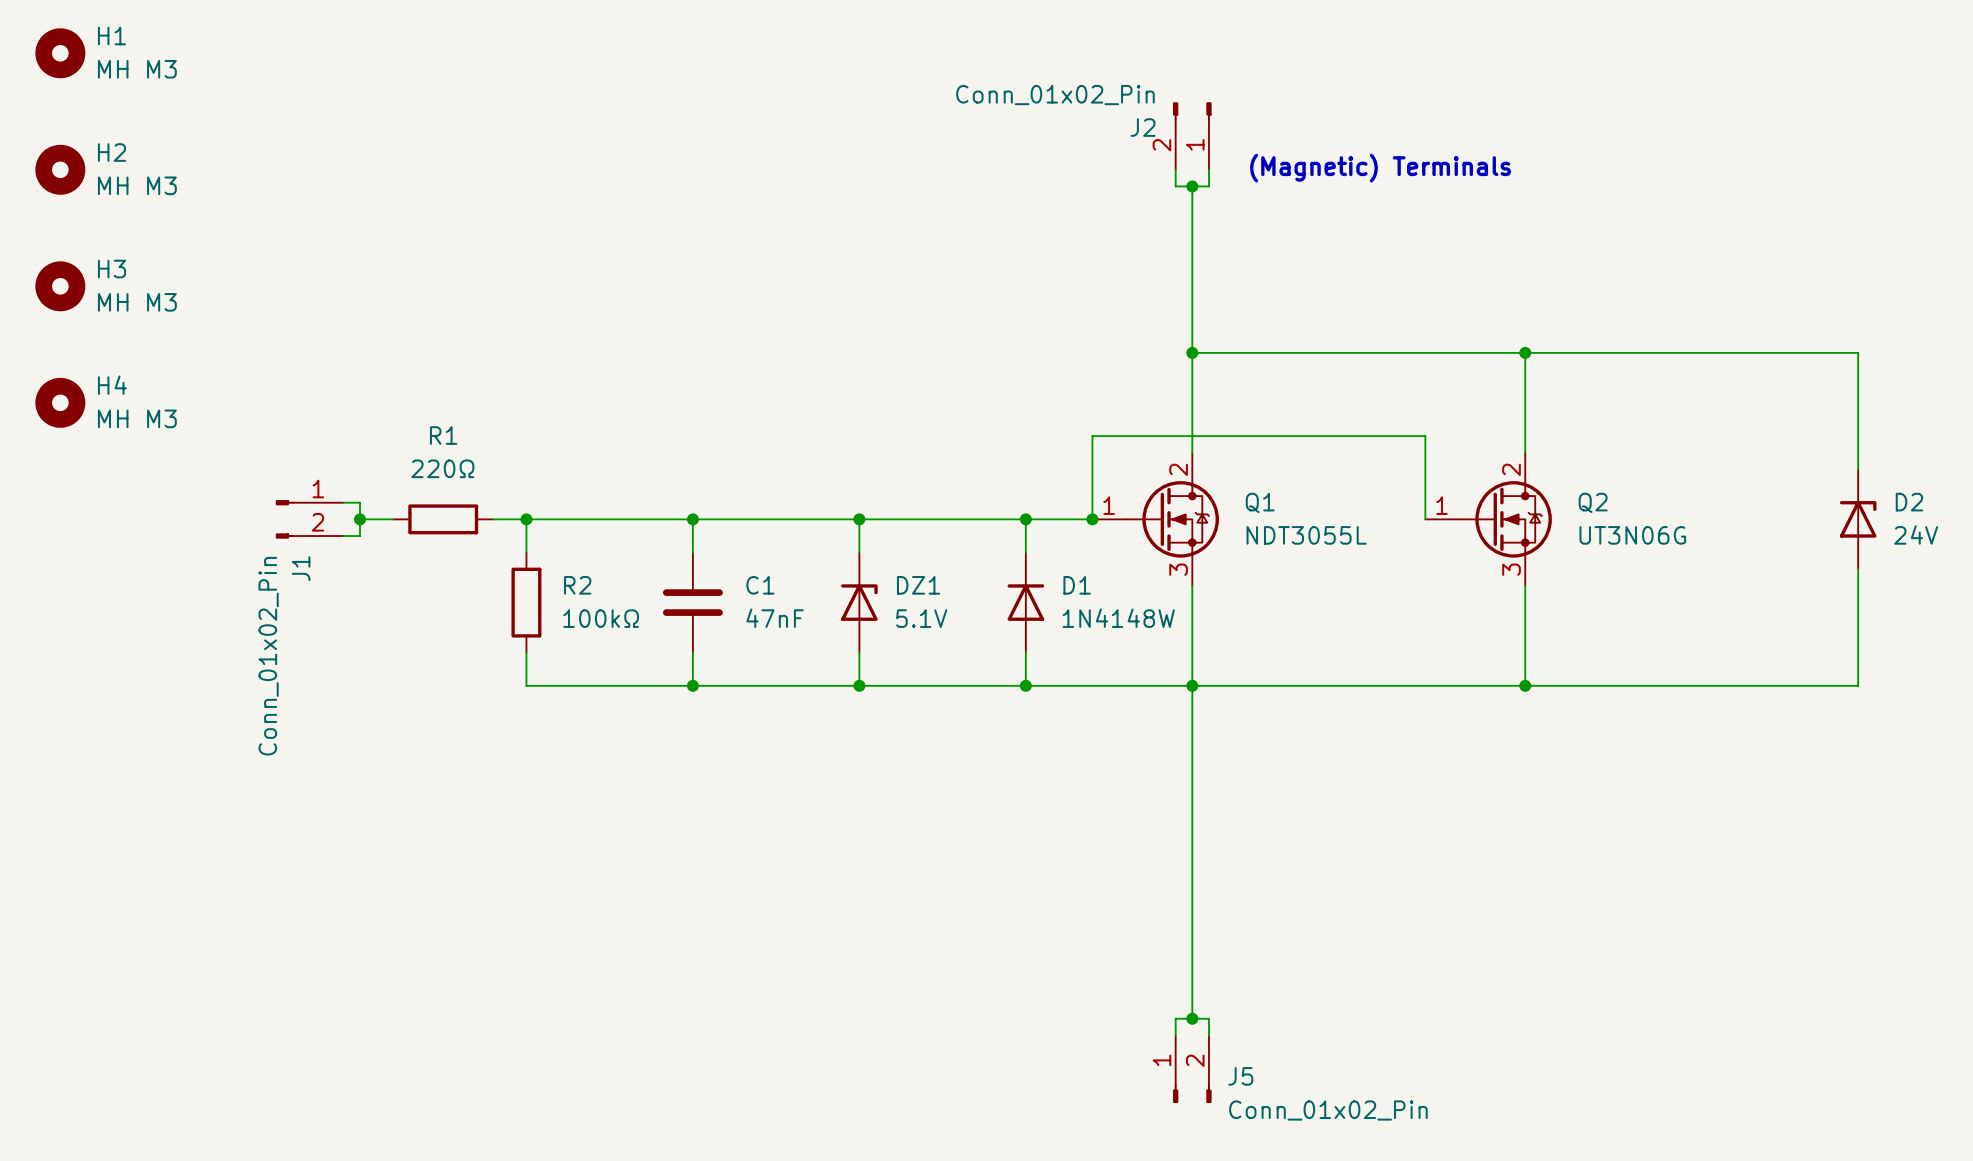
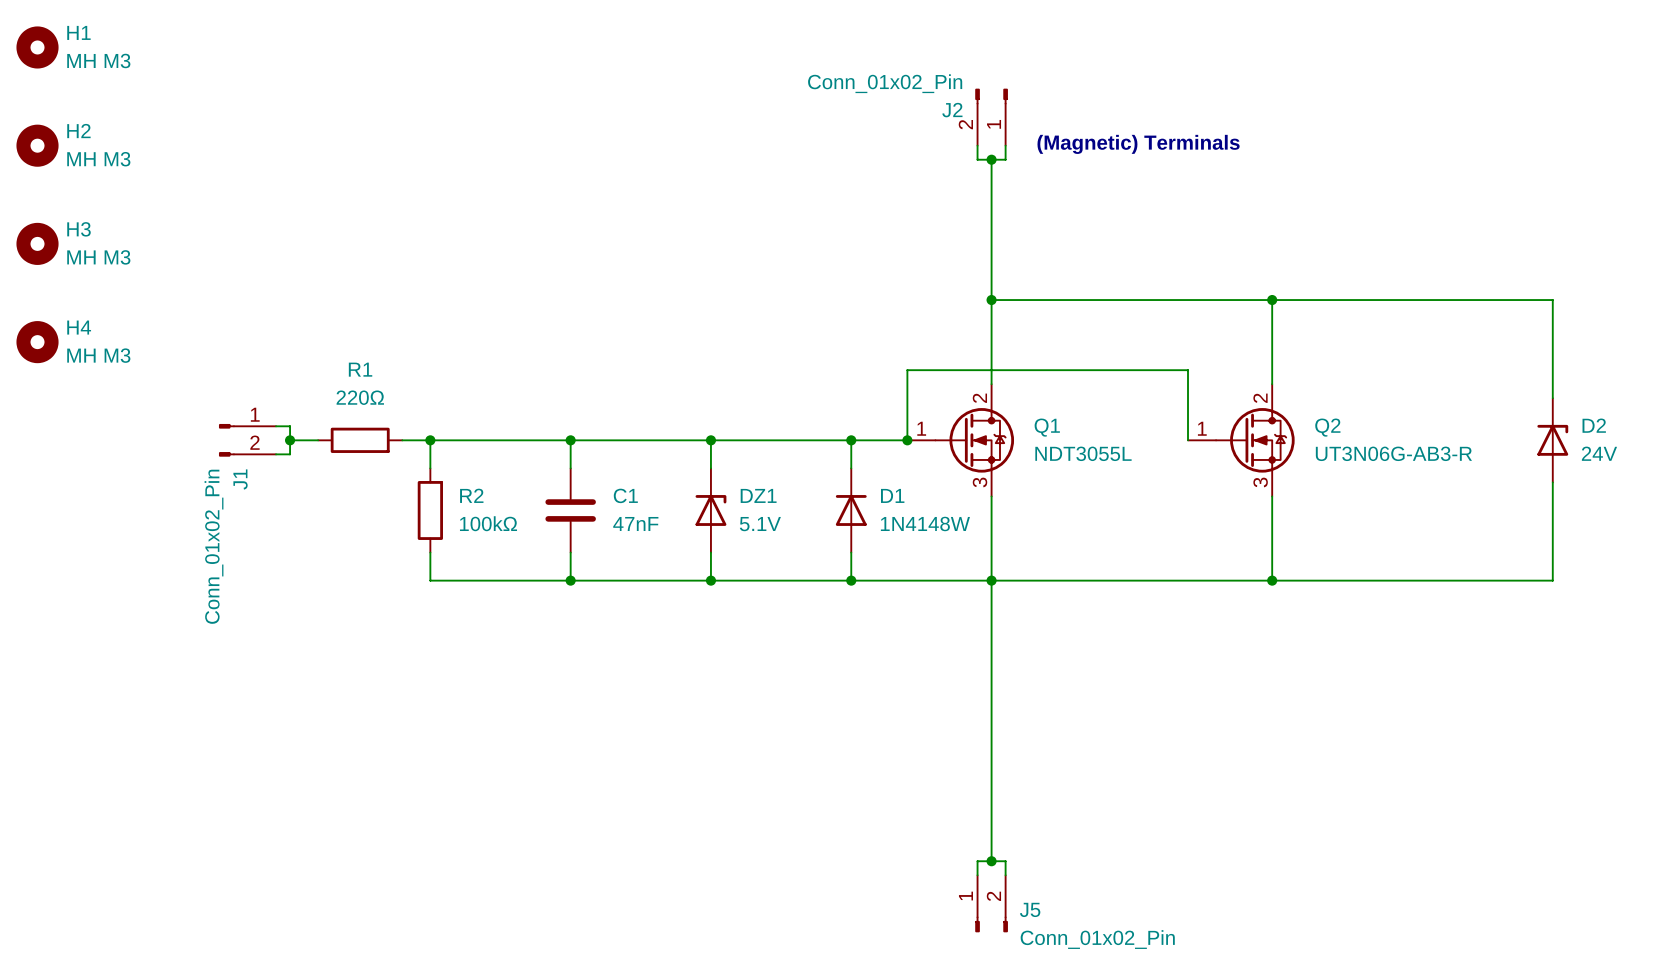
Q2 value: UT3N06G (1632, 535) -> UT3N06G-AB3-R (1393, 453)

